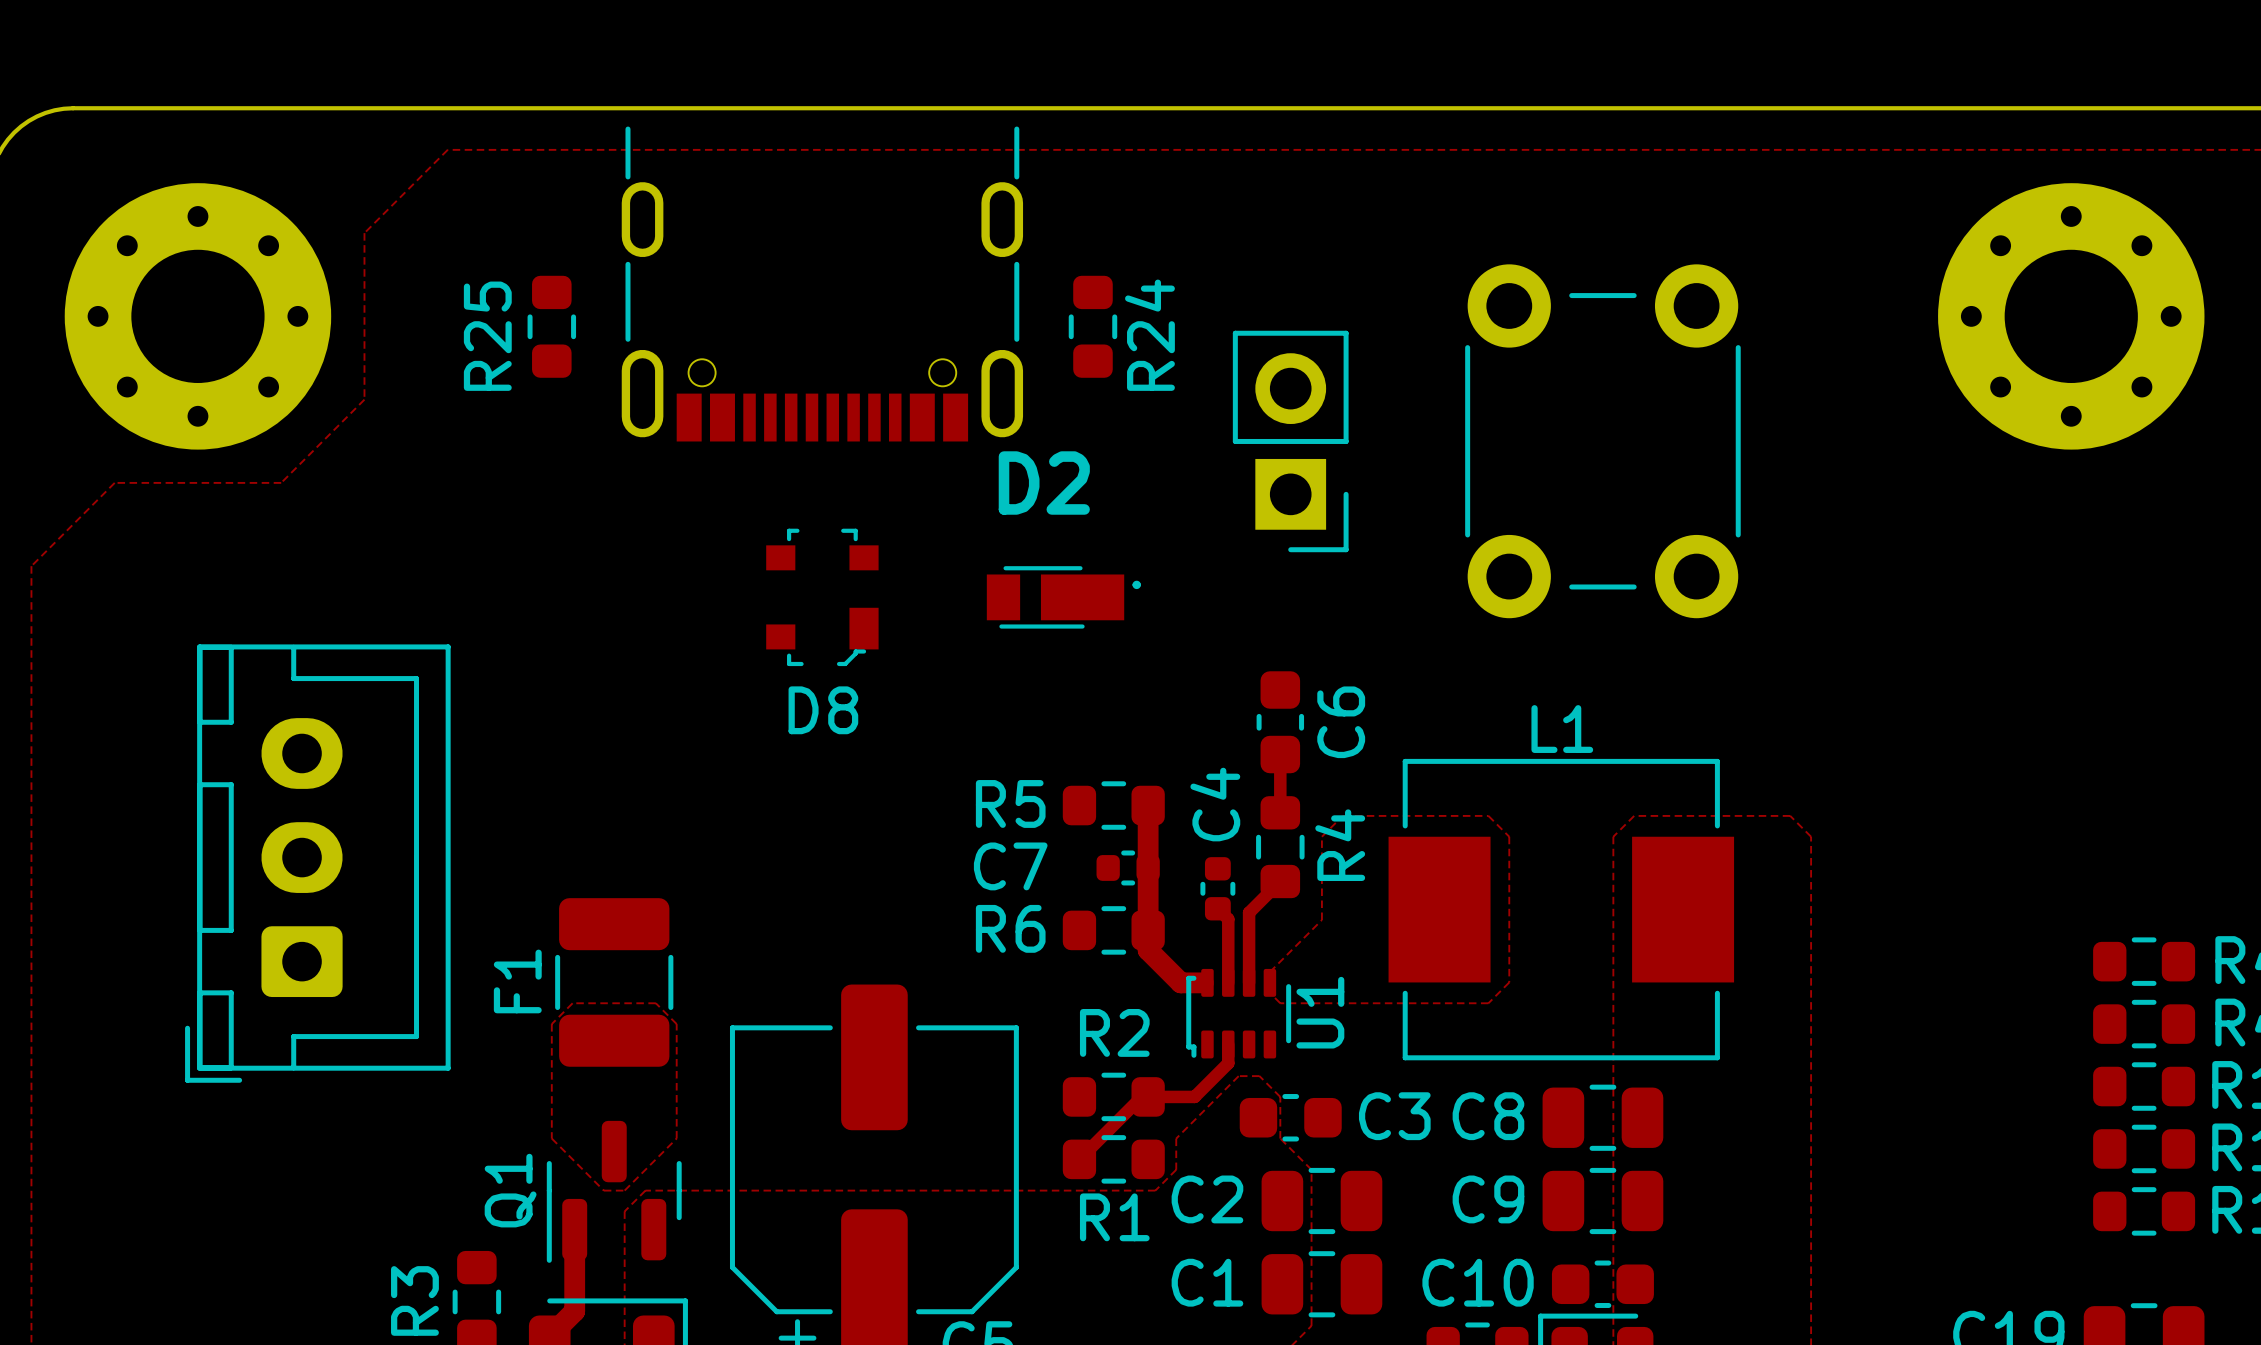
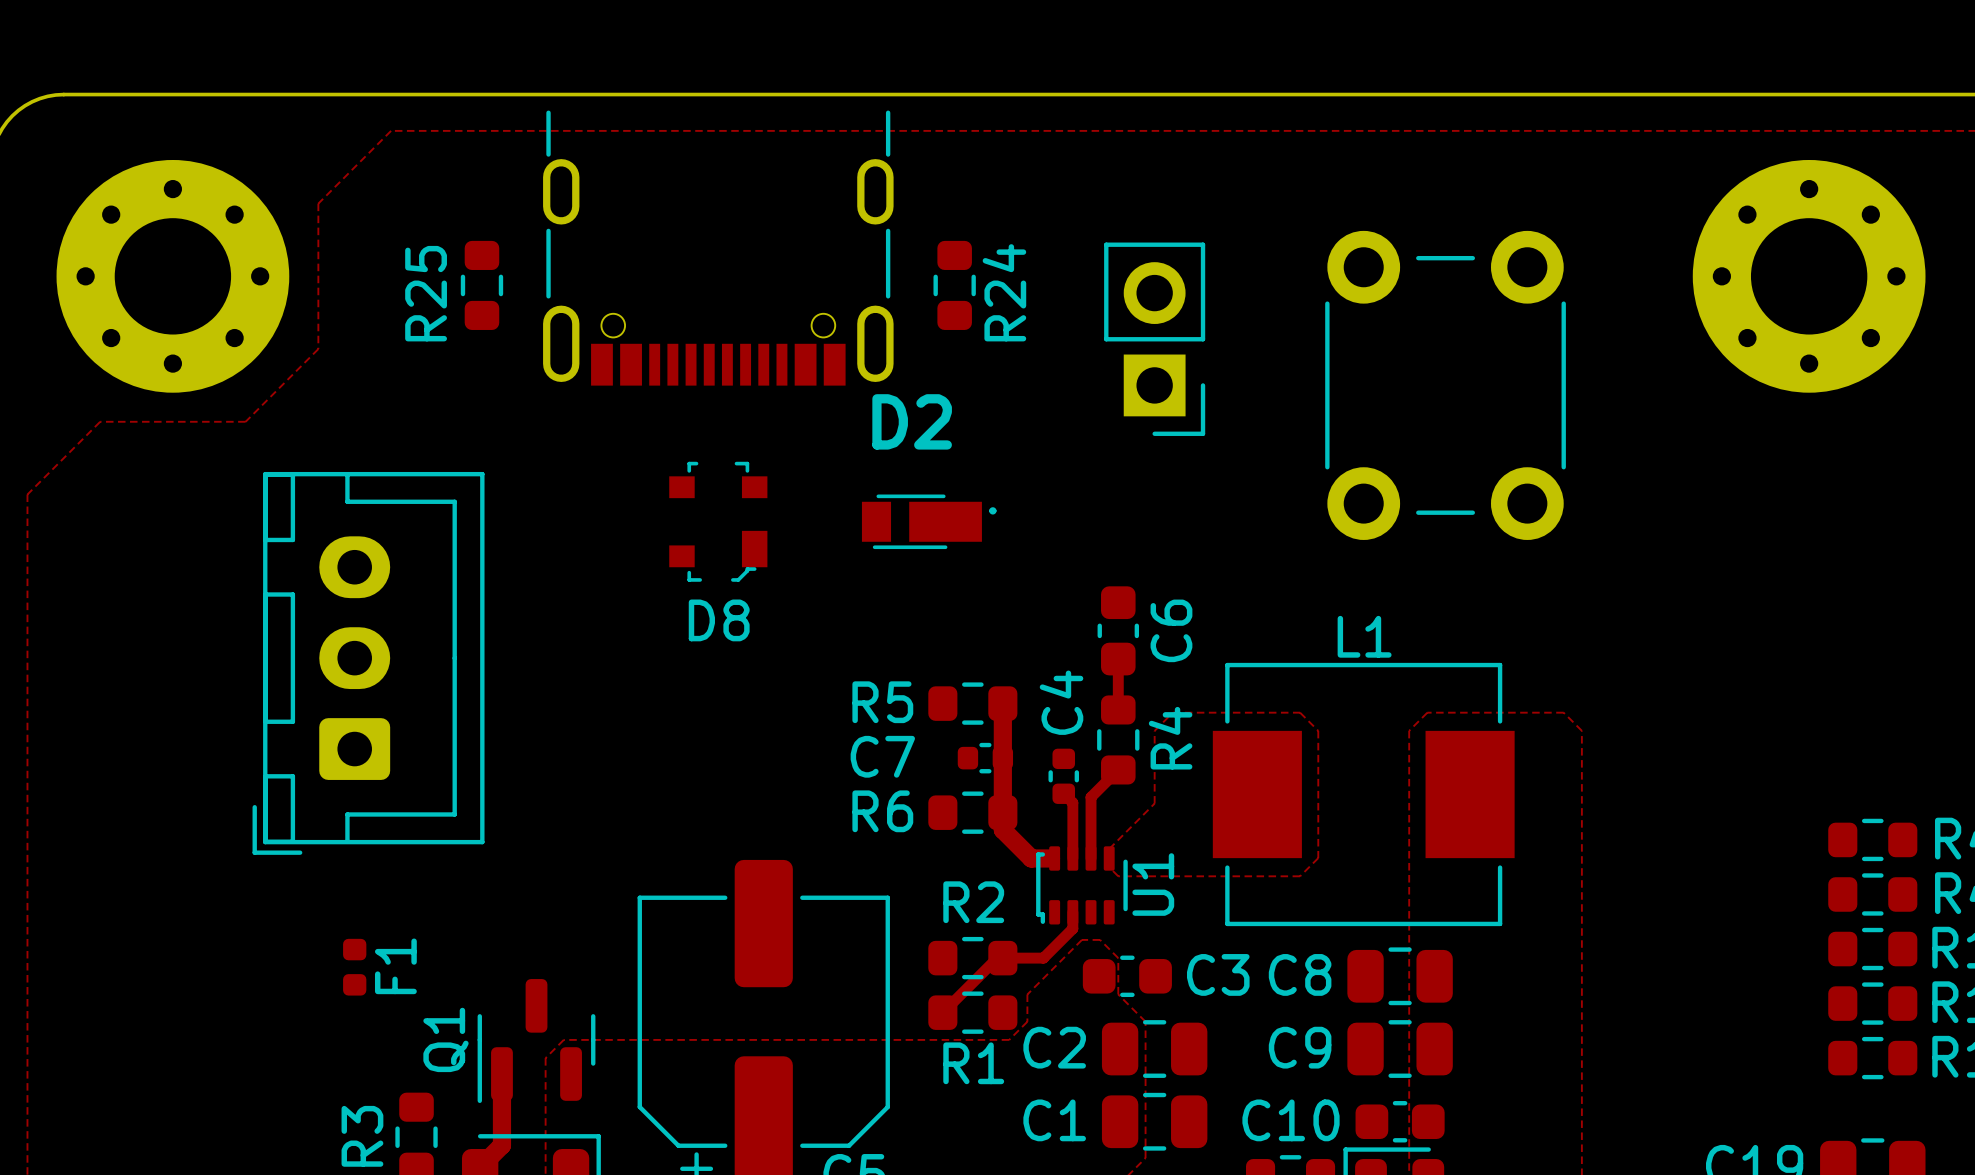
part position: (1290, 441) -> (1154, 339)
part position: (1602, 441) -> (1445, 385)
part position: (317, 863) -> (368, 663)
F1 footprint: [555, 898, 674, 1067] -> [343, 938, 367, 996]
F1 name position: F1 (517, 981) -> F1 (395, 966)
zone outline: (572, 1003) (551, 1024) (551, 1138) (603, 1190) (624, 1190) (676, 1138) (676, 1024) (655, 1003) (572, 1003) -> none

